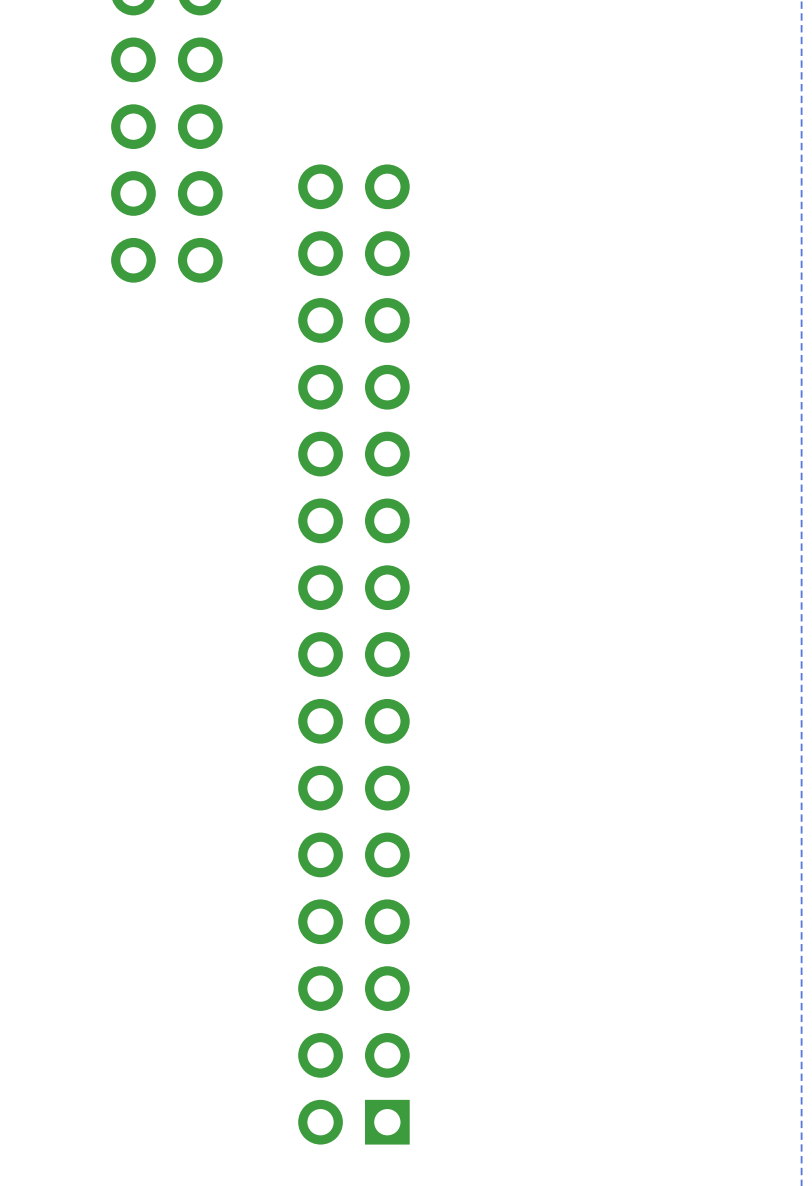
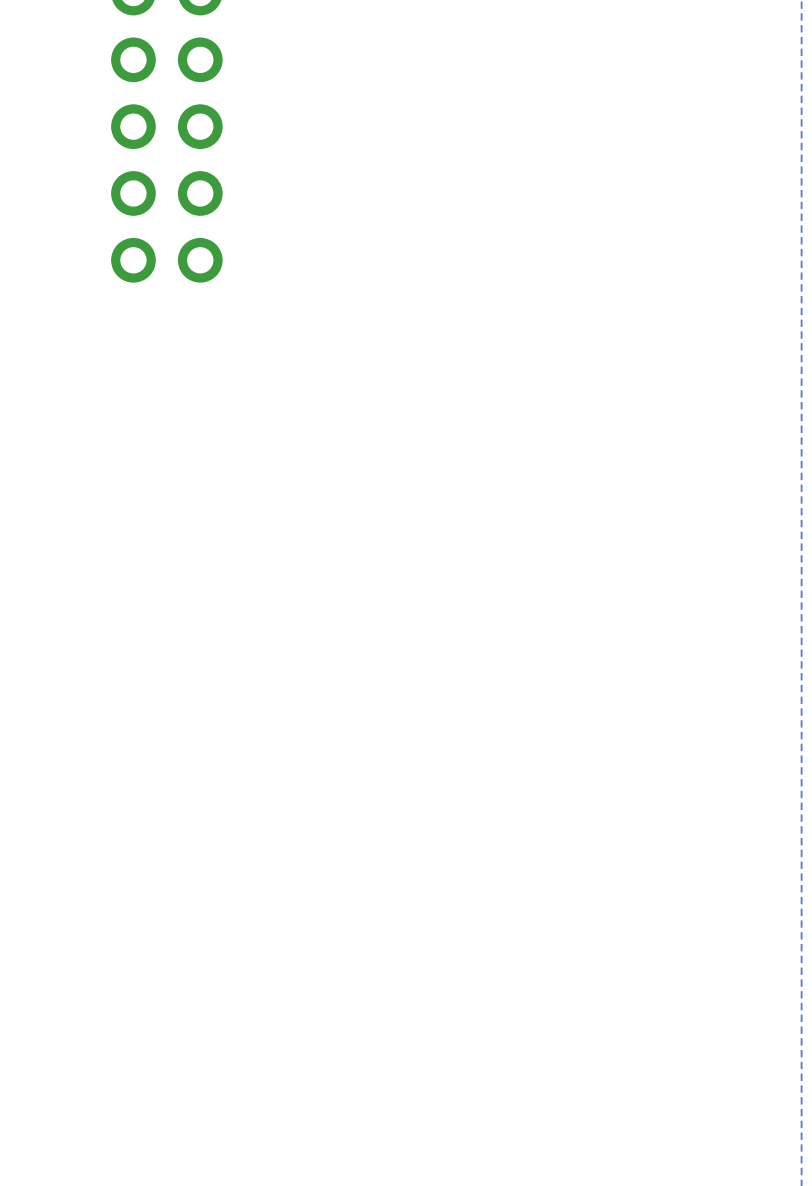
part: (353, 654) -> none

